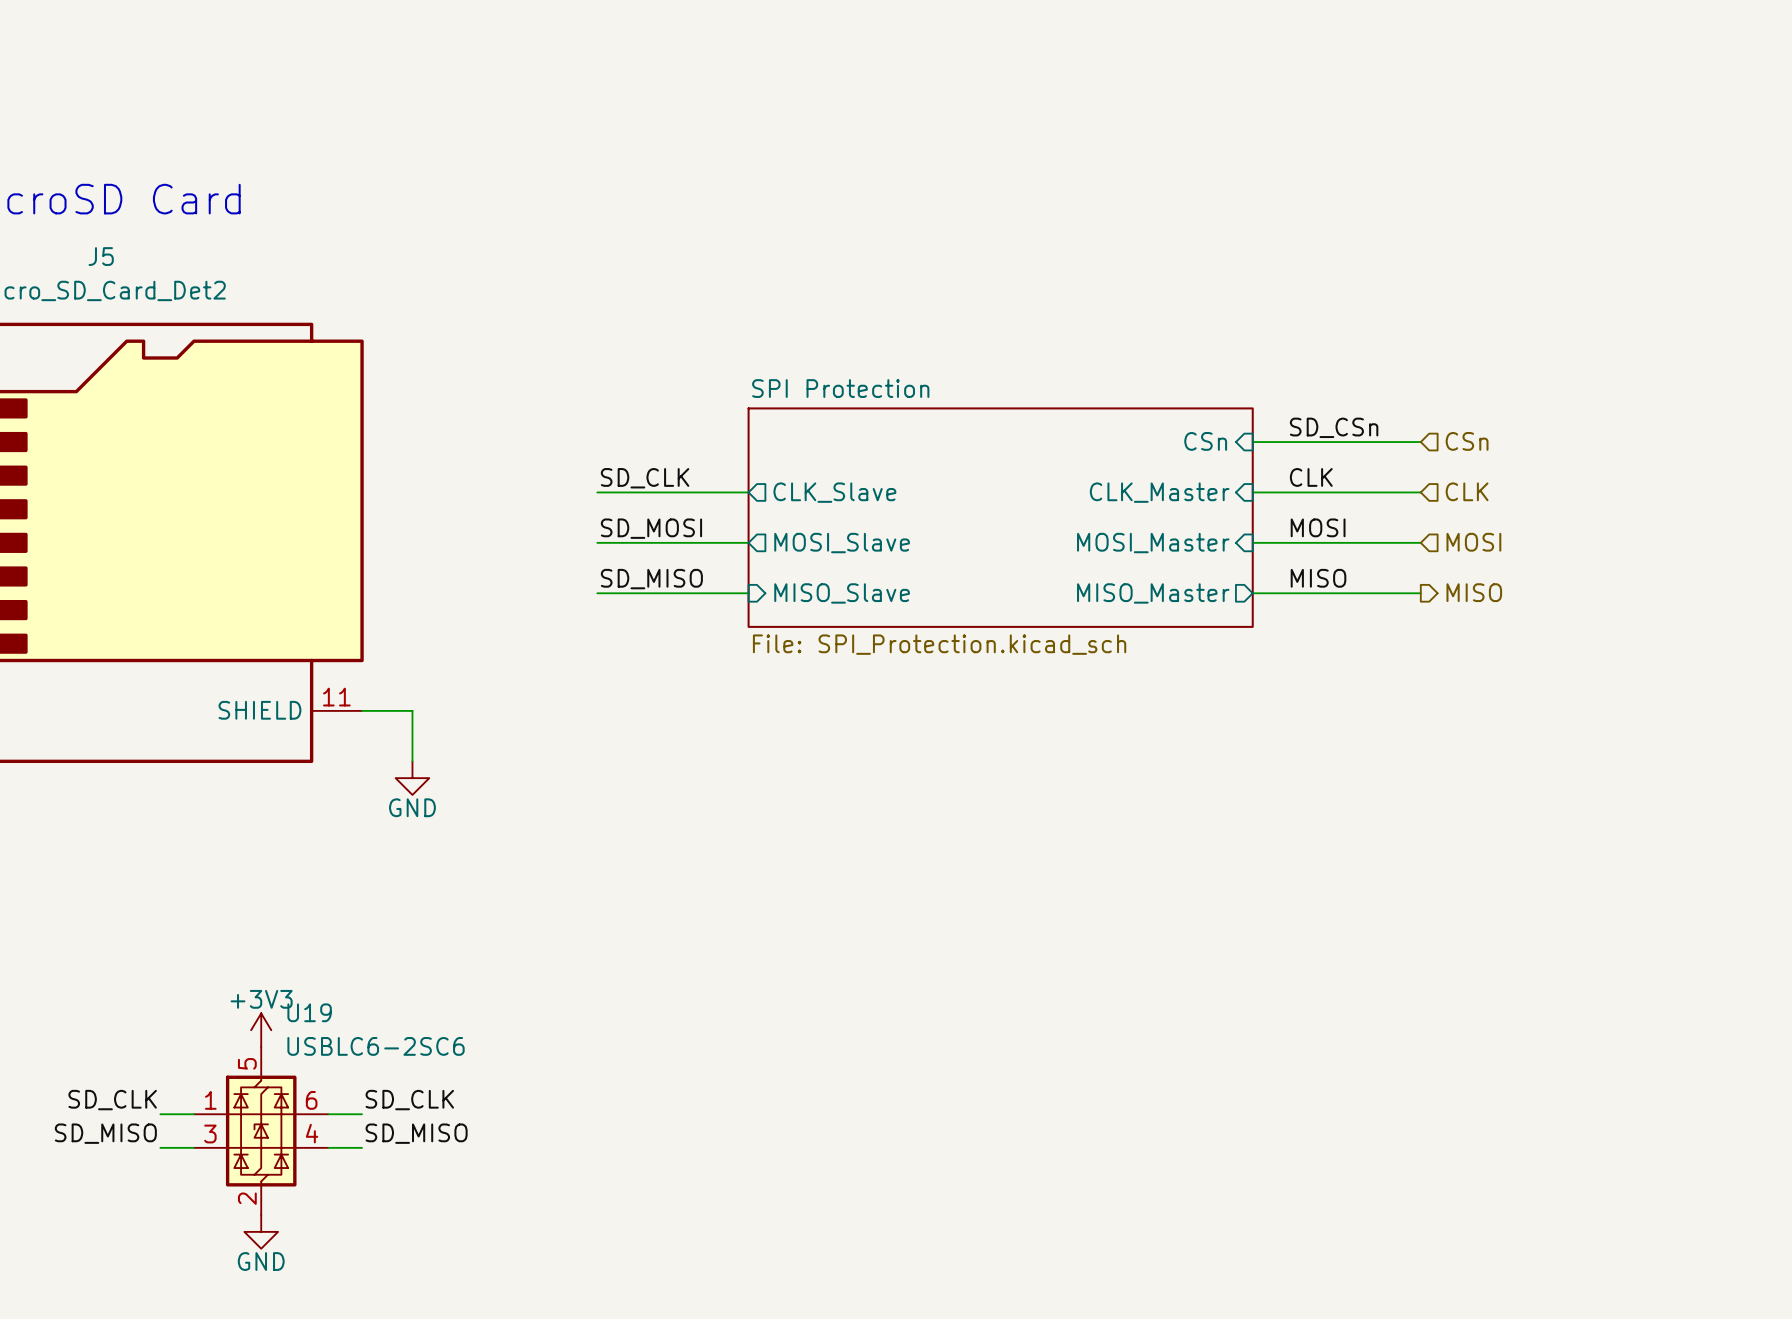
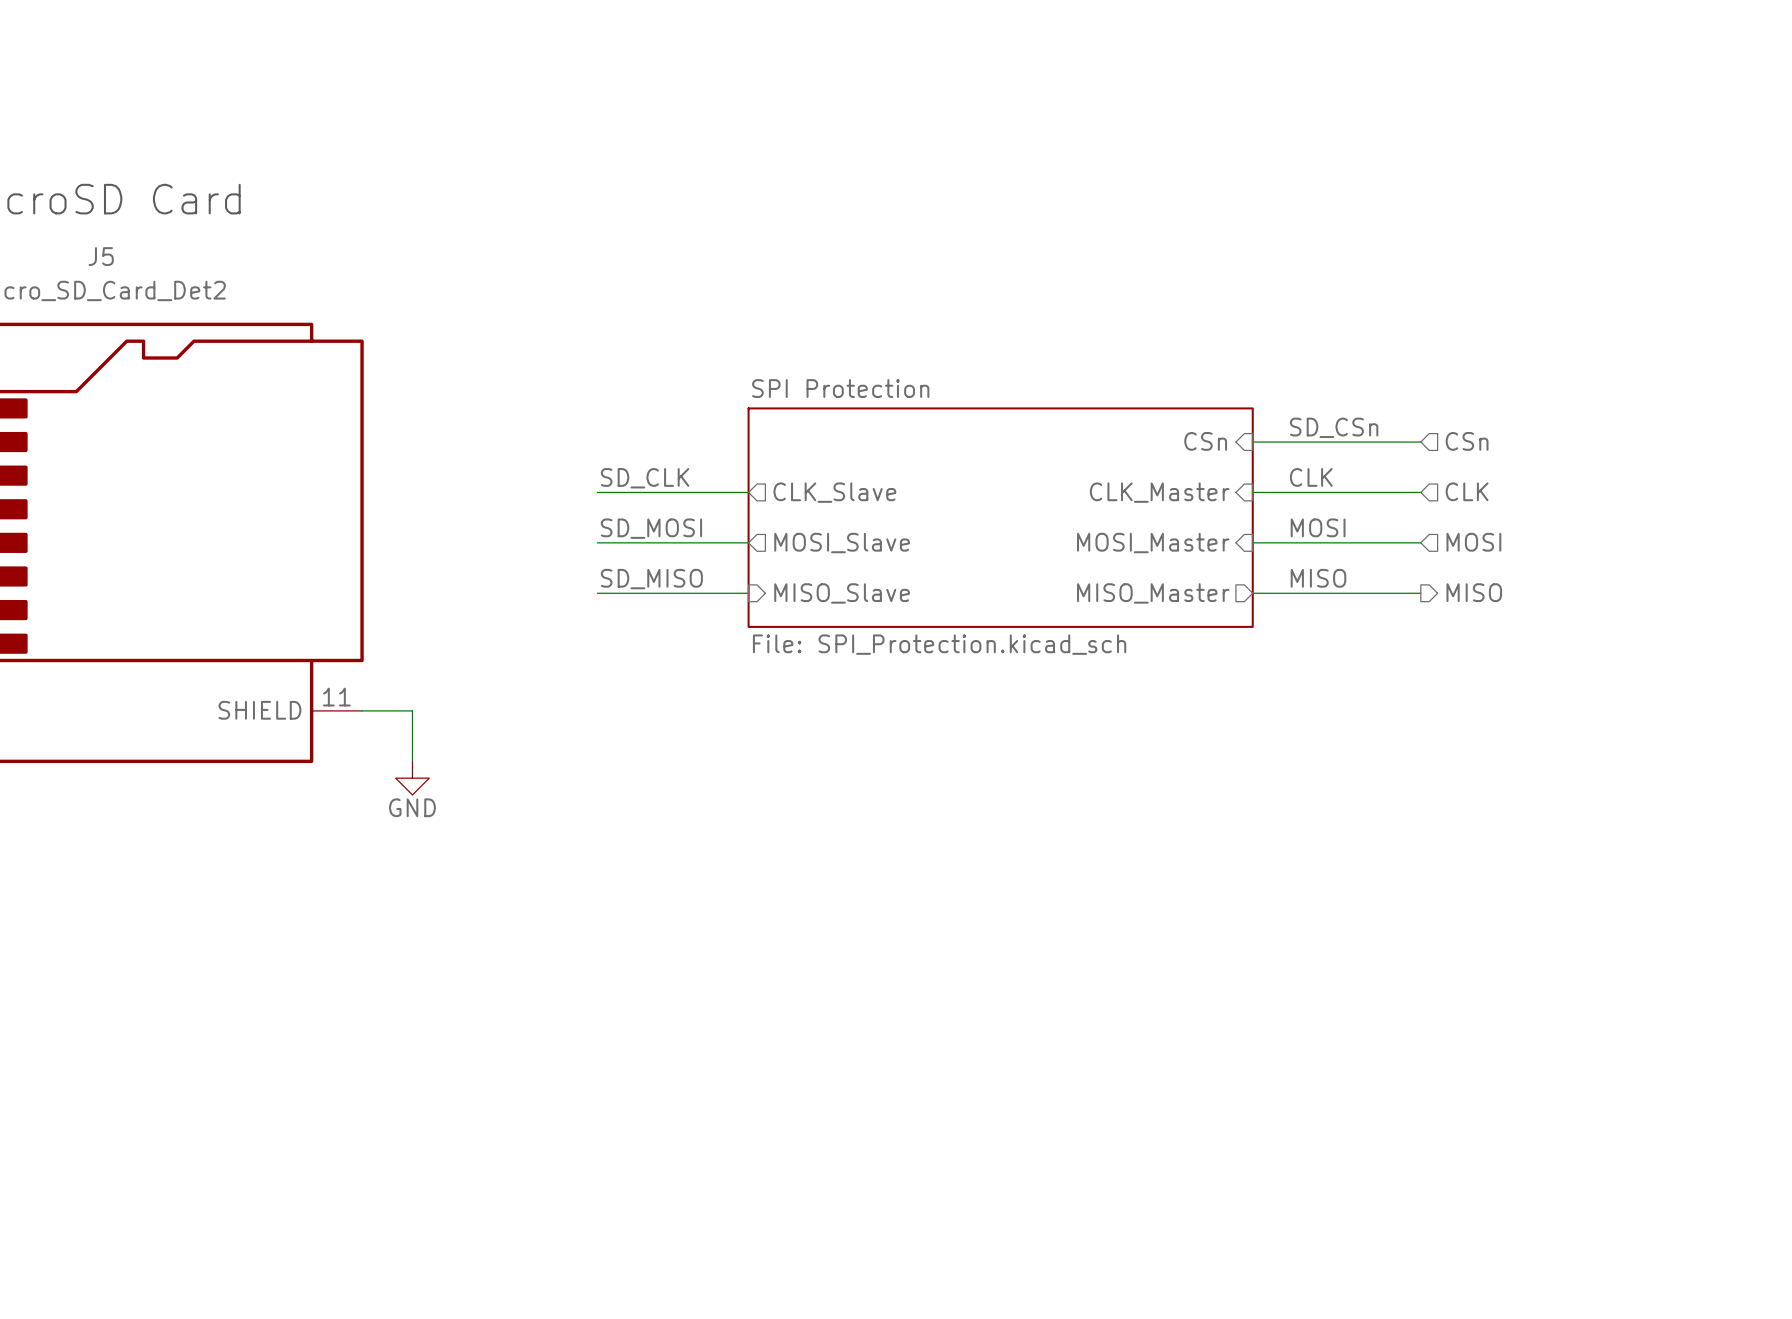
power symbol: +3V3 (261, 1030) -> none
label: SD_CLK (112, 1100) -> none
label: SD_CLK (409, 1100) -> none
wire: (160, 1114) (194, 1114) -> none
wire: (328, 1114) (362, 1114) -> none
U19: USBLC6-2SC6 (261, 1131) -> none
label: SD_MISO (105, 1133) -> none
label: SD_MISO (416, 1133) -> none
wire: (160, 1147) (194, 1147) -> none
wire: (328, 1147) (362, 1147) -> none
power symbol: GND (261, 1231) -> none

